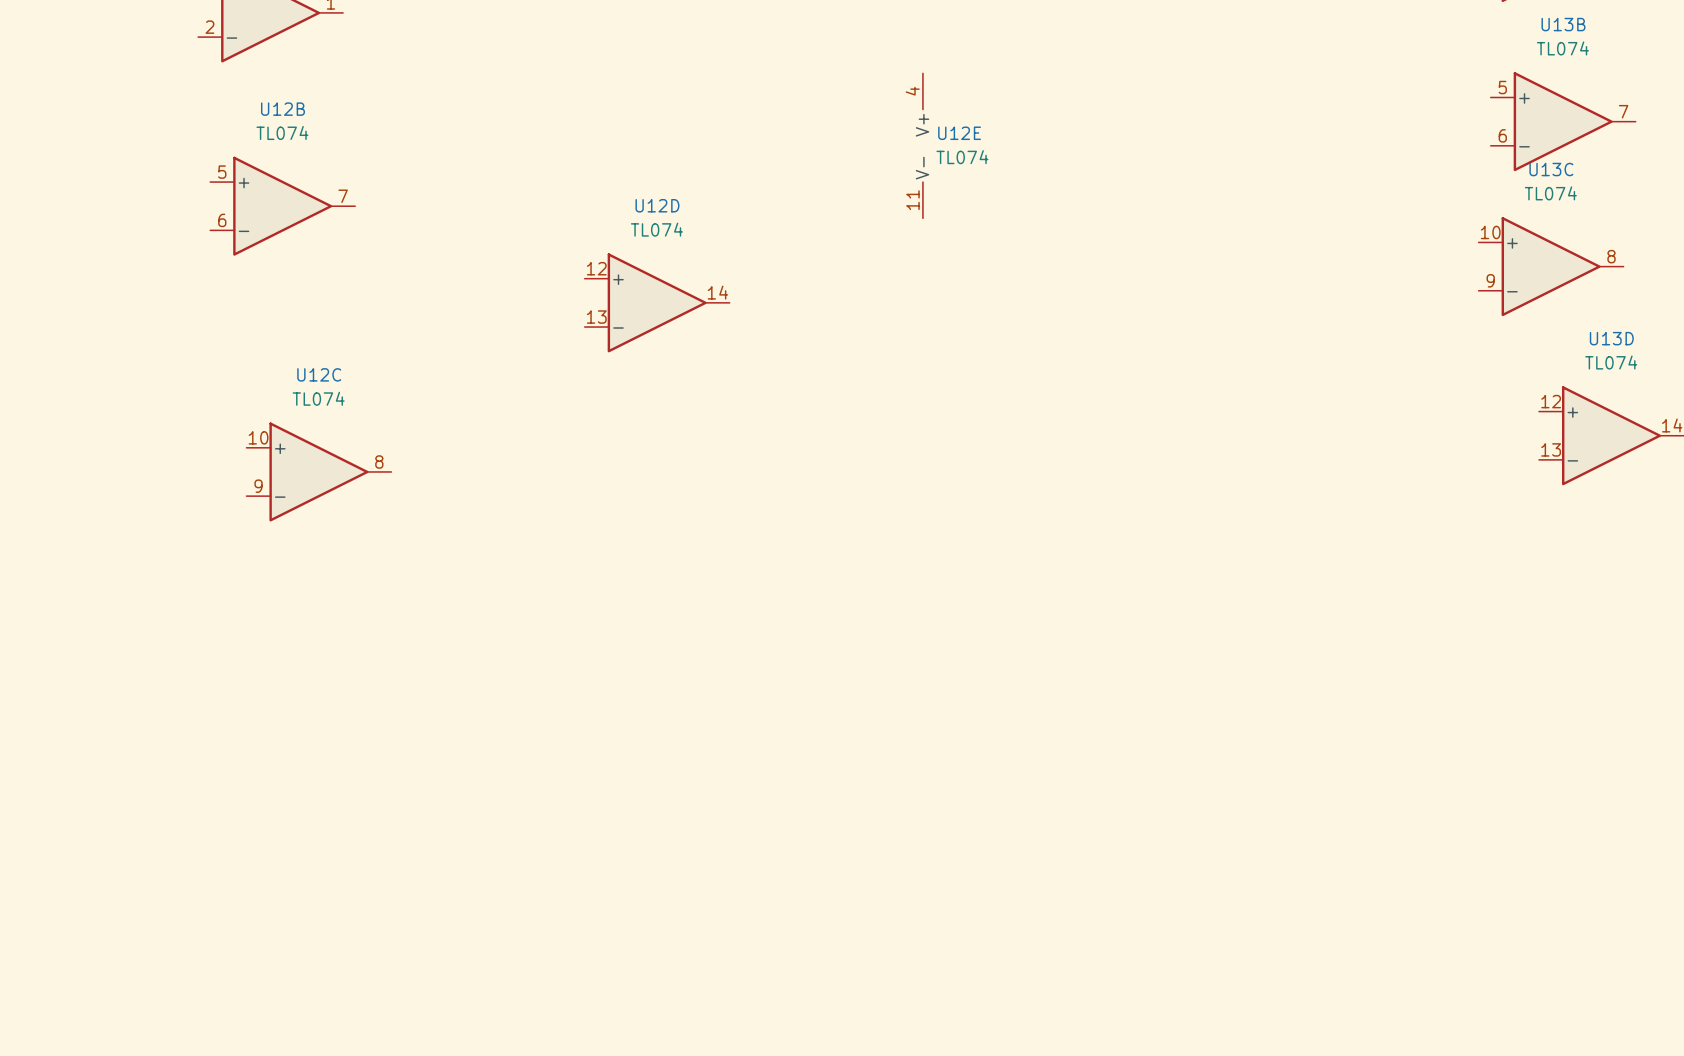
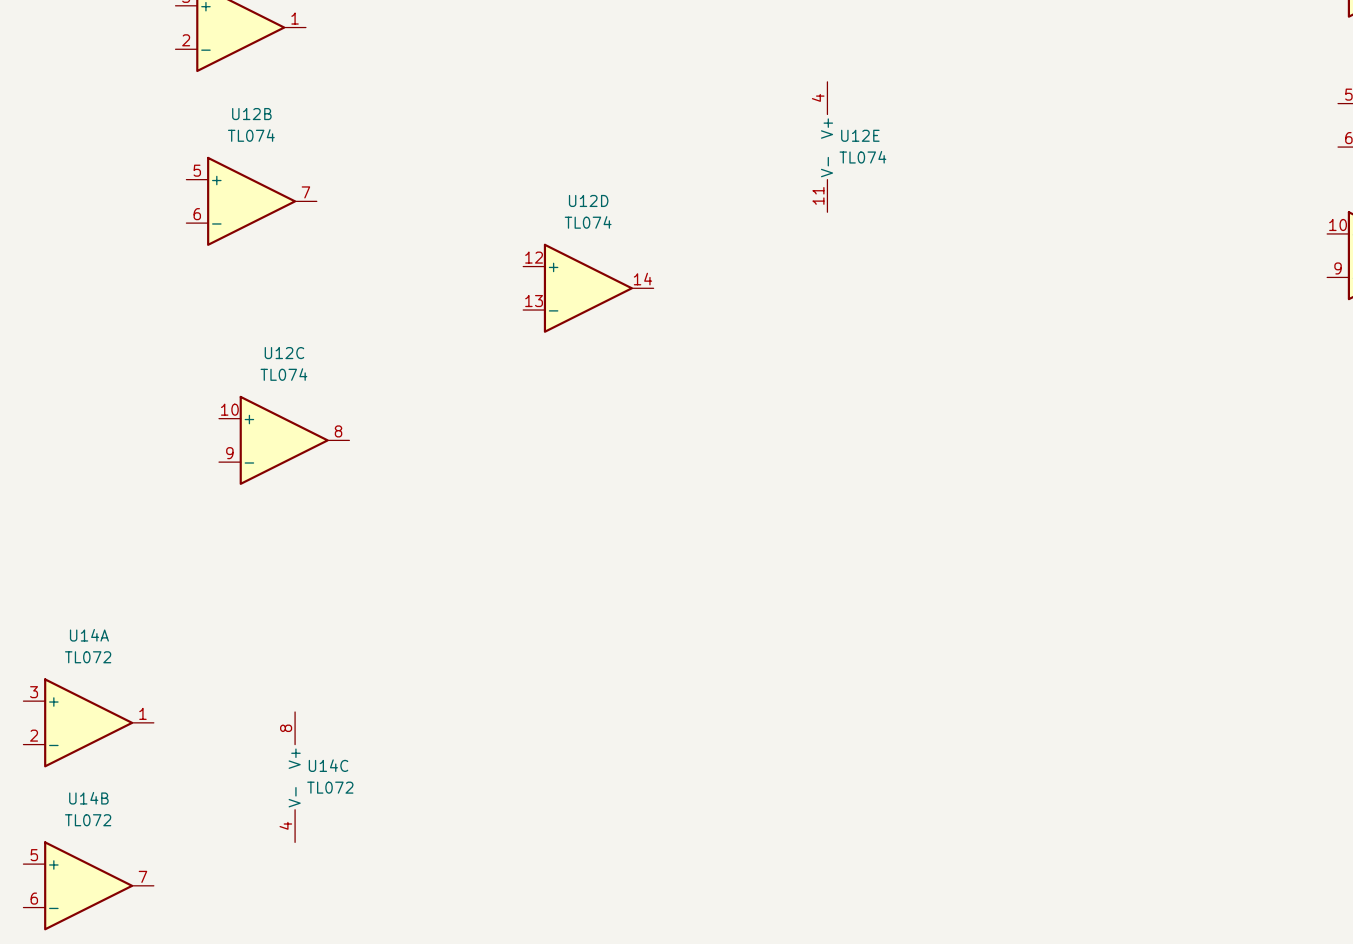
U14A: none -> TL072 (88, 722)
U14C: none -> TL072 (295, 777)
U14B: none -> TL072 (88, 885)

